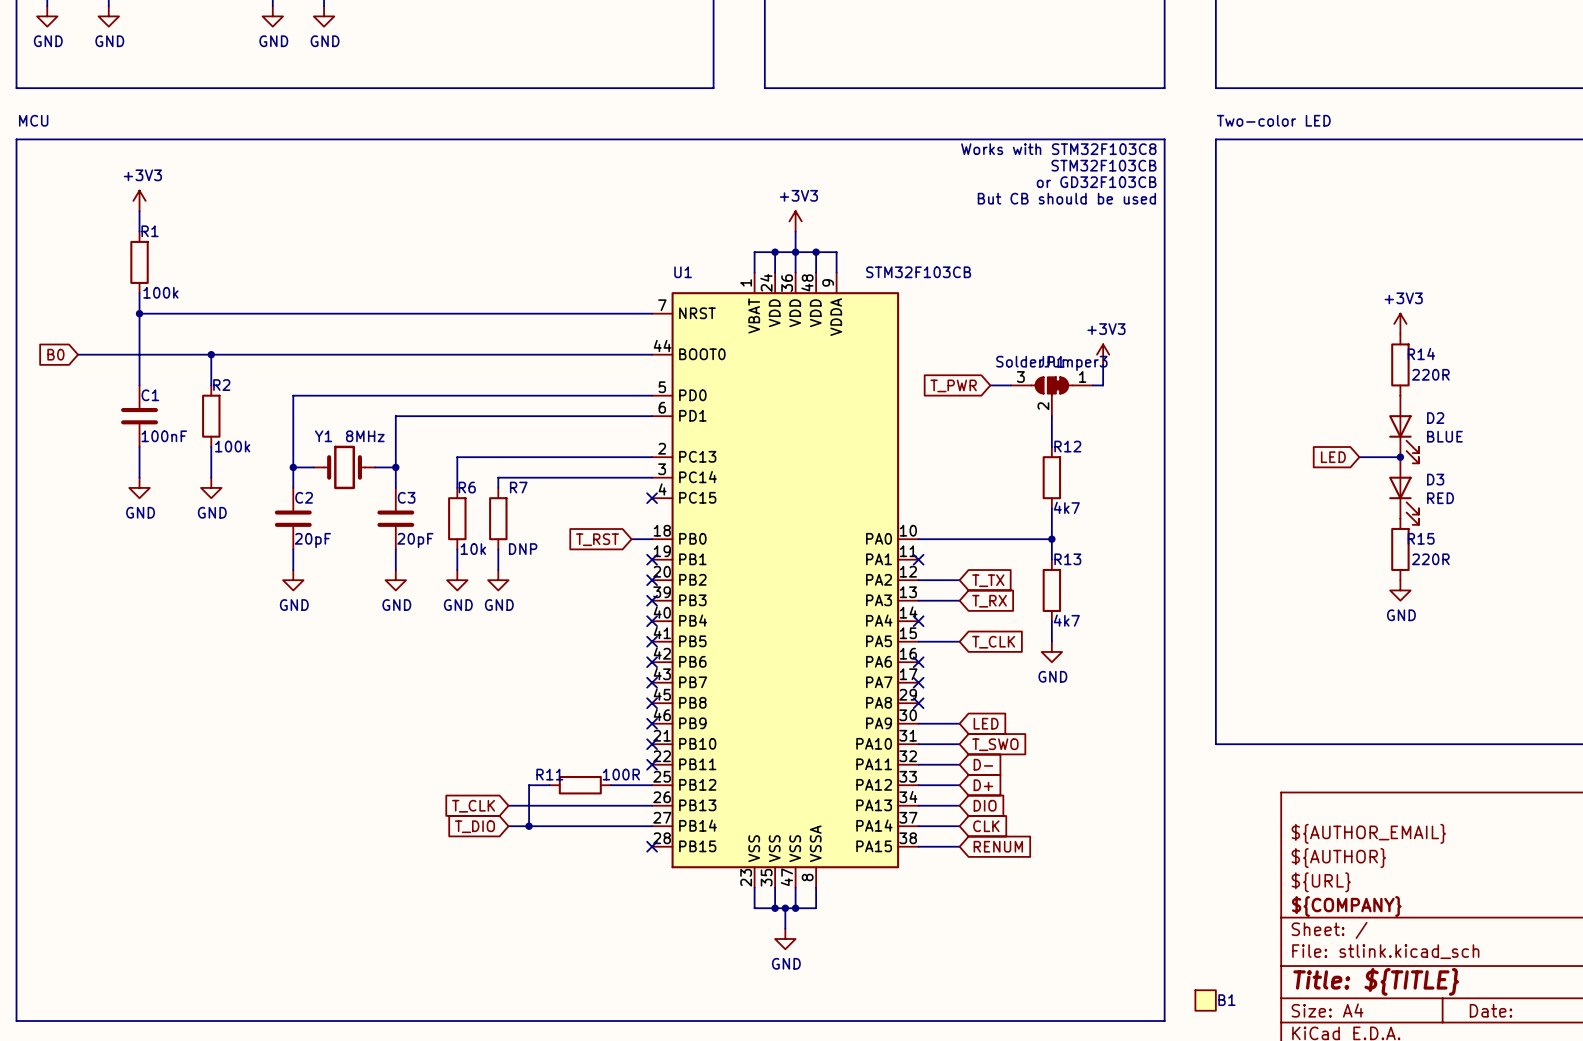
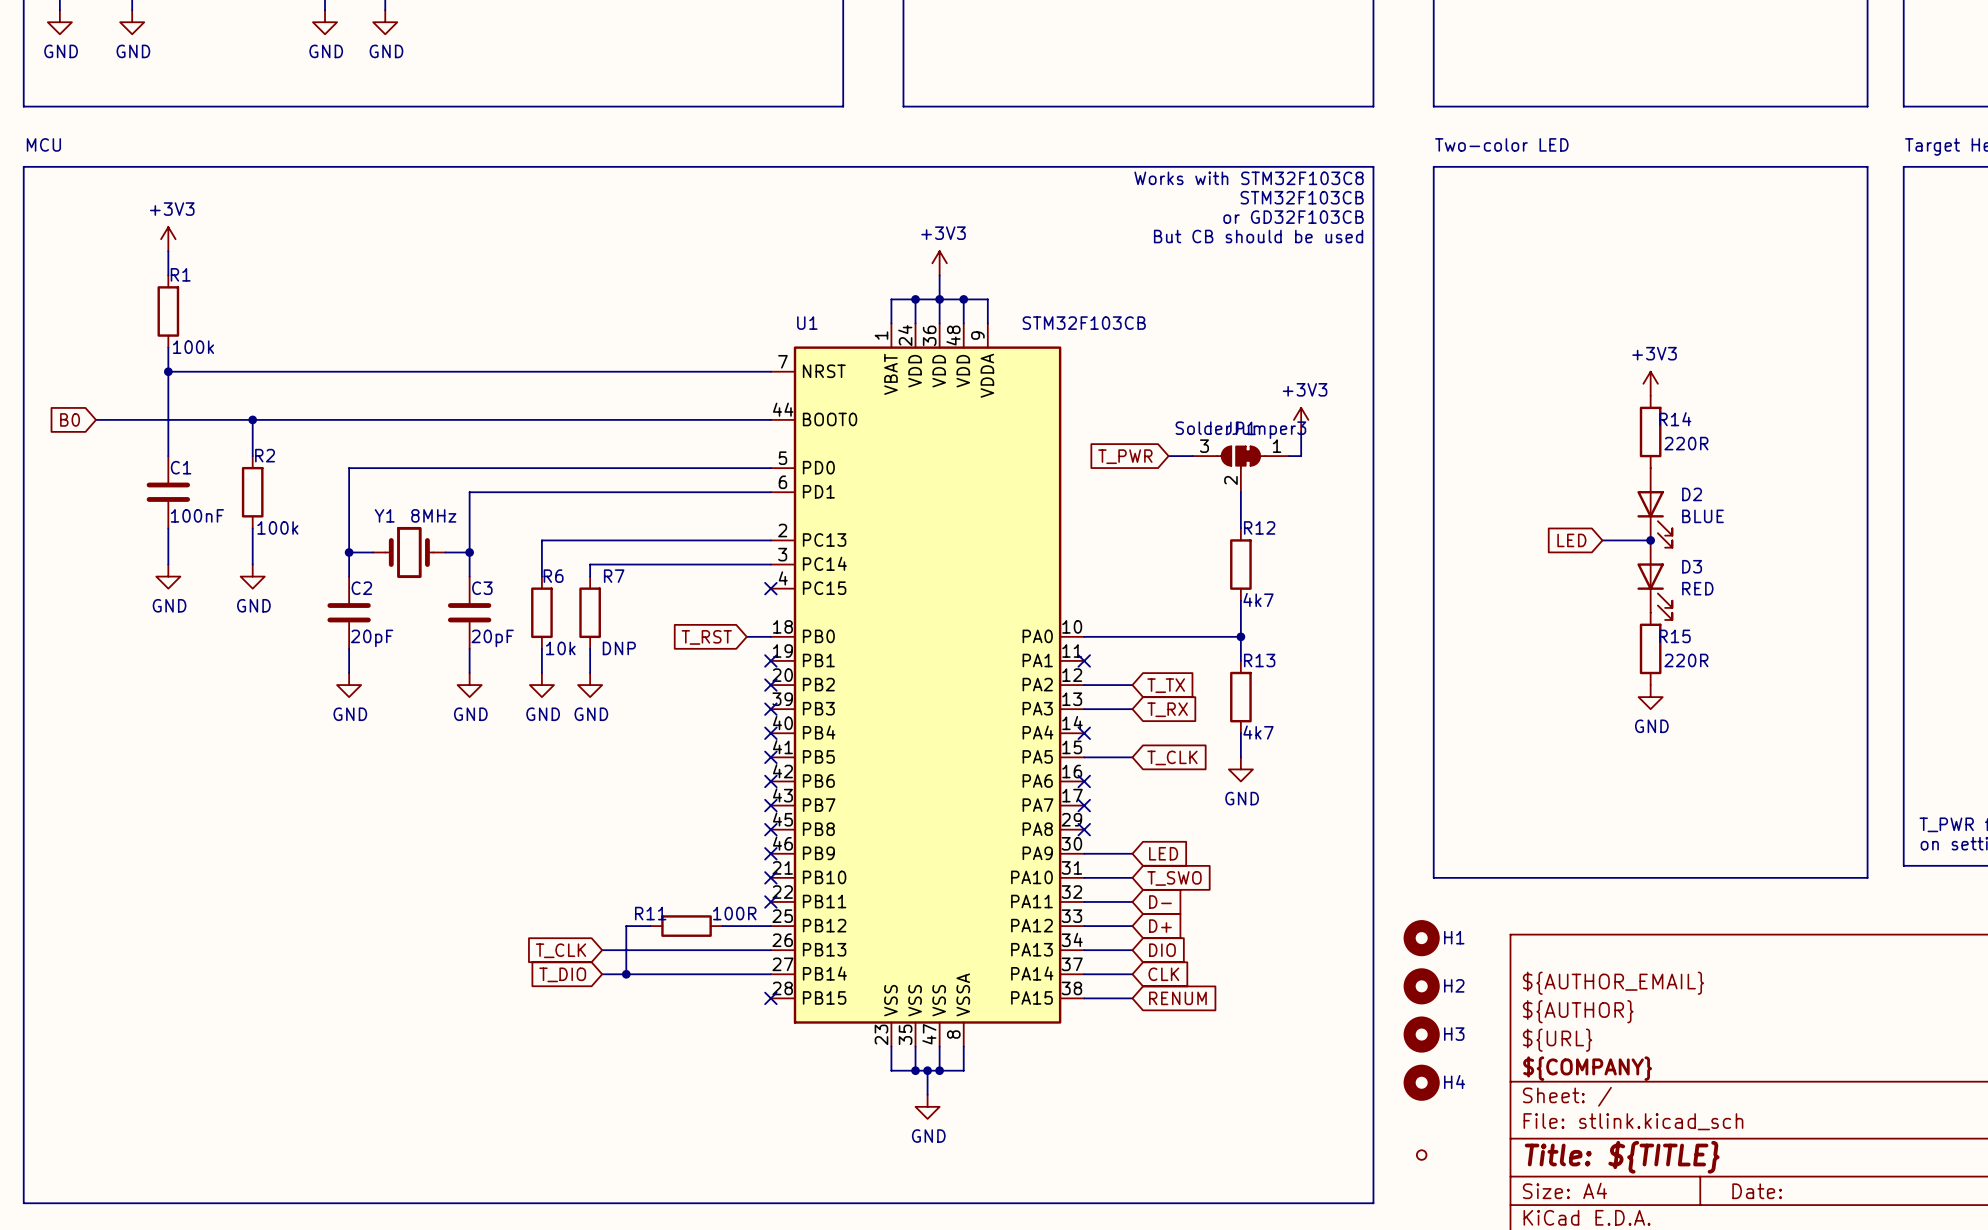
H1: none -> (1421, 938)
H2: none -> (1421, 986)
H3: none -> (1421, 1034)
H4: none -> (1421, 1082)
part: none -> (1421, 1155)
B1: (1205, 1000) -> none

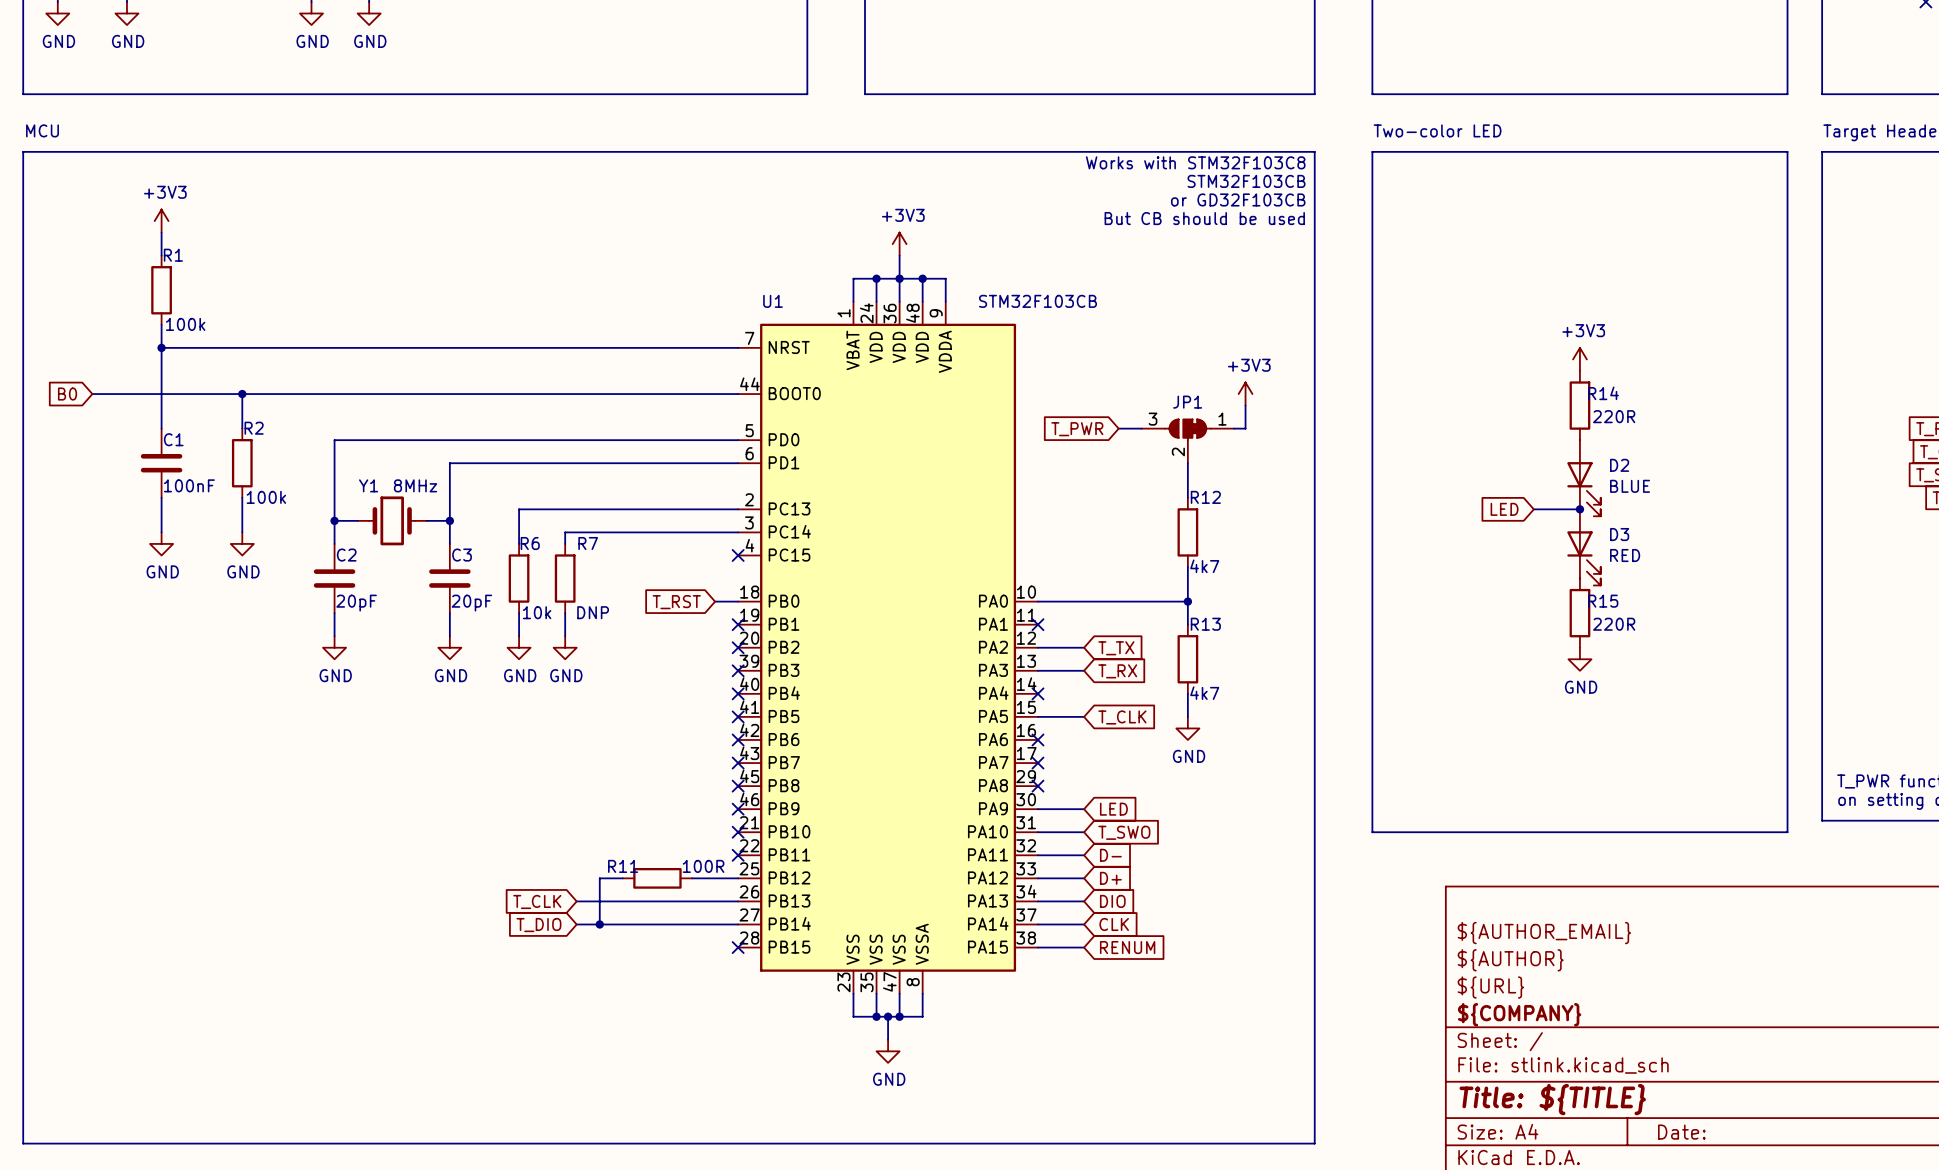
JP1 value: SolderJumper3 (1240, 430) -> none
H1: (1421, 938) -> none
H2: (1421, 986) -> none
H3: (1421, 1034) -> none
H4: (1421, 1082) -> none
part: (1421, 1155) -> none

